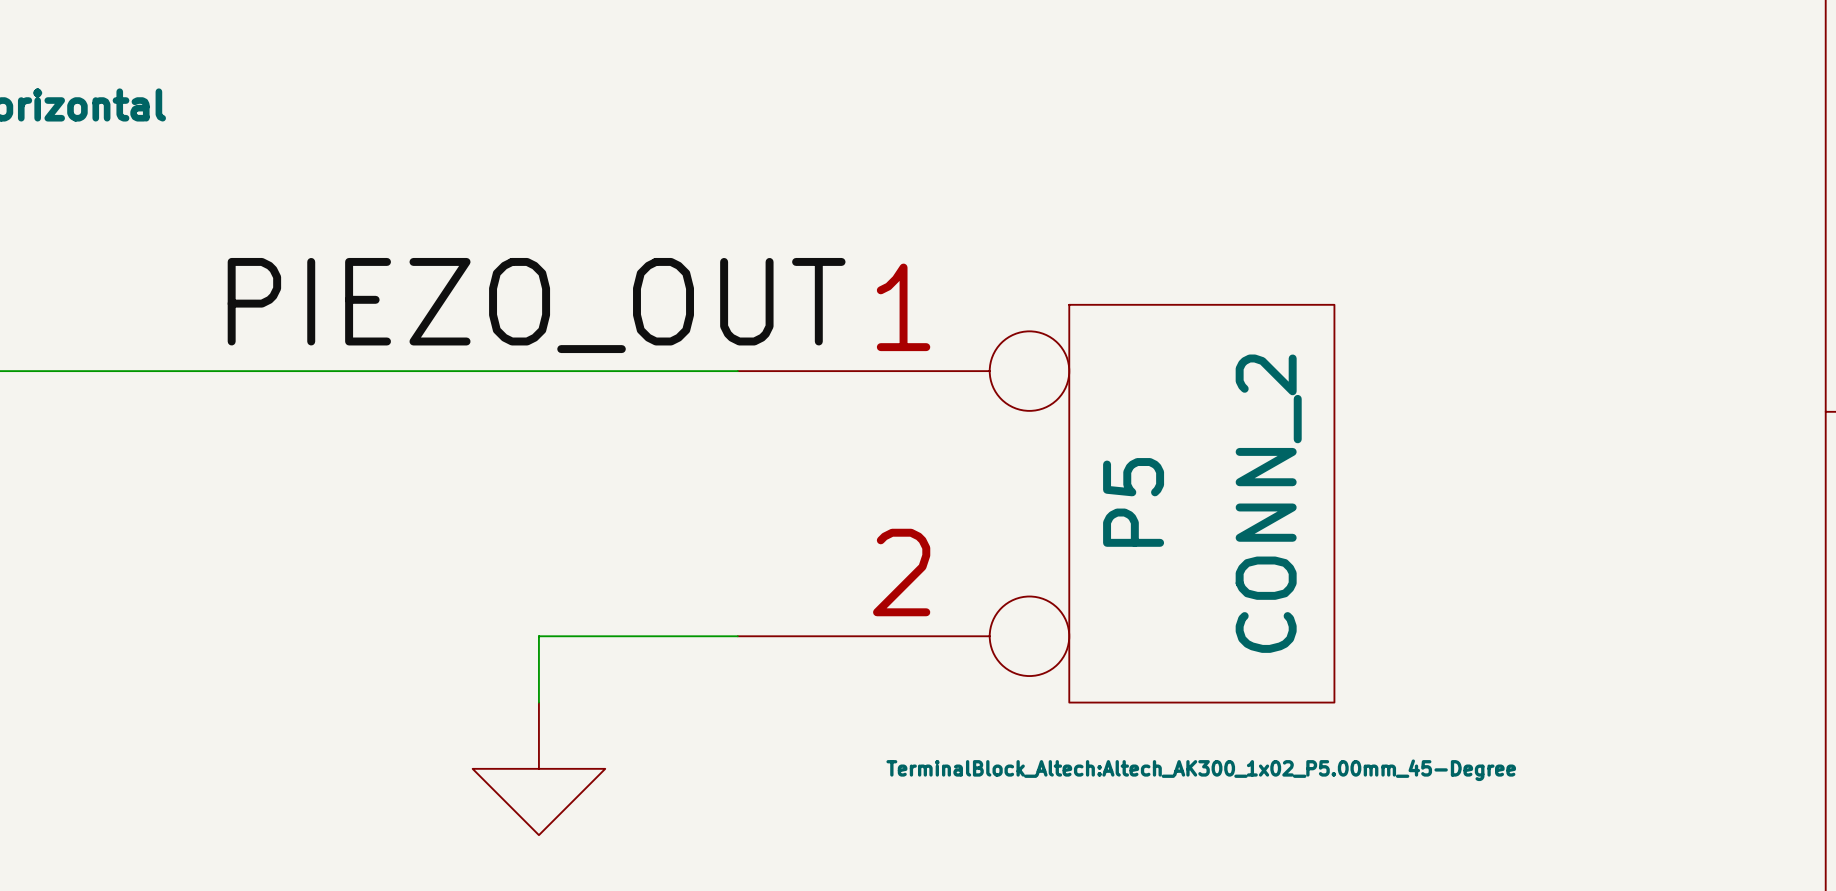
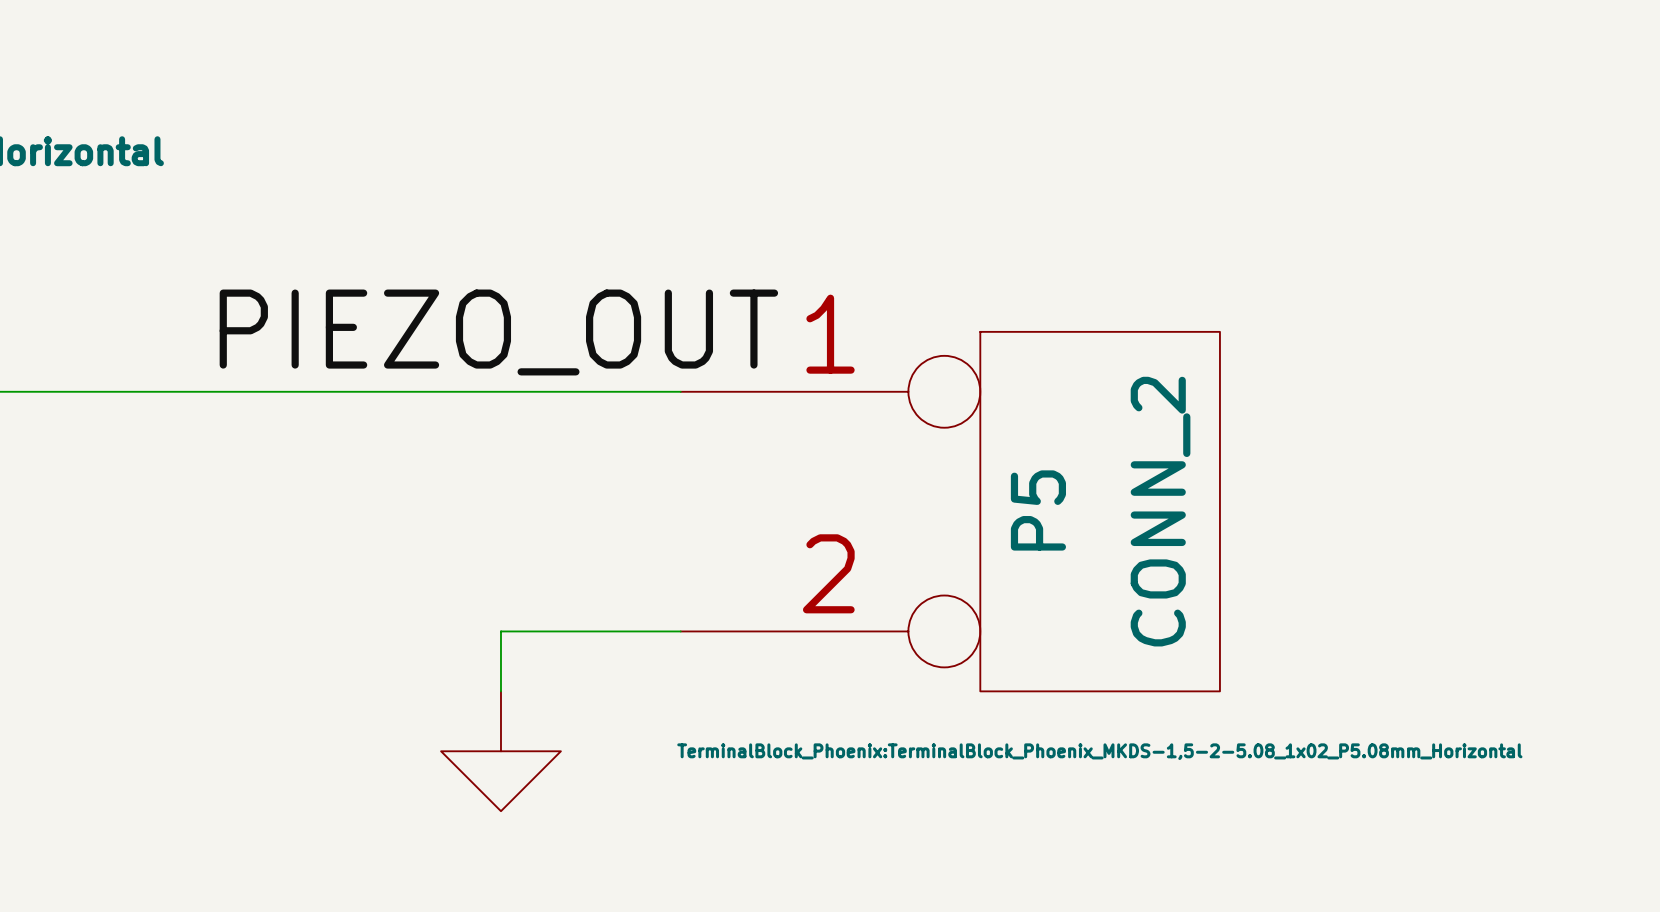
P5 text: TerminalBlock_Altech:Altech_AK300_1x02_P5.00mm_45-Degree (1201, 770) -> TerminalBlock_Phoenix:TerminalBlock_Phoenix_MKDS-1,5-2-5.08_1x02_P5.08mm_Horizontal (1099, 751)

